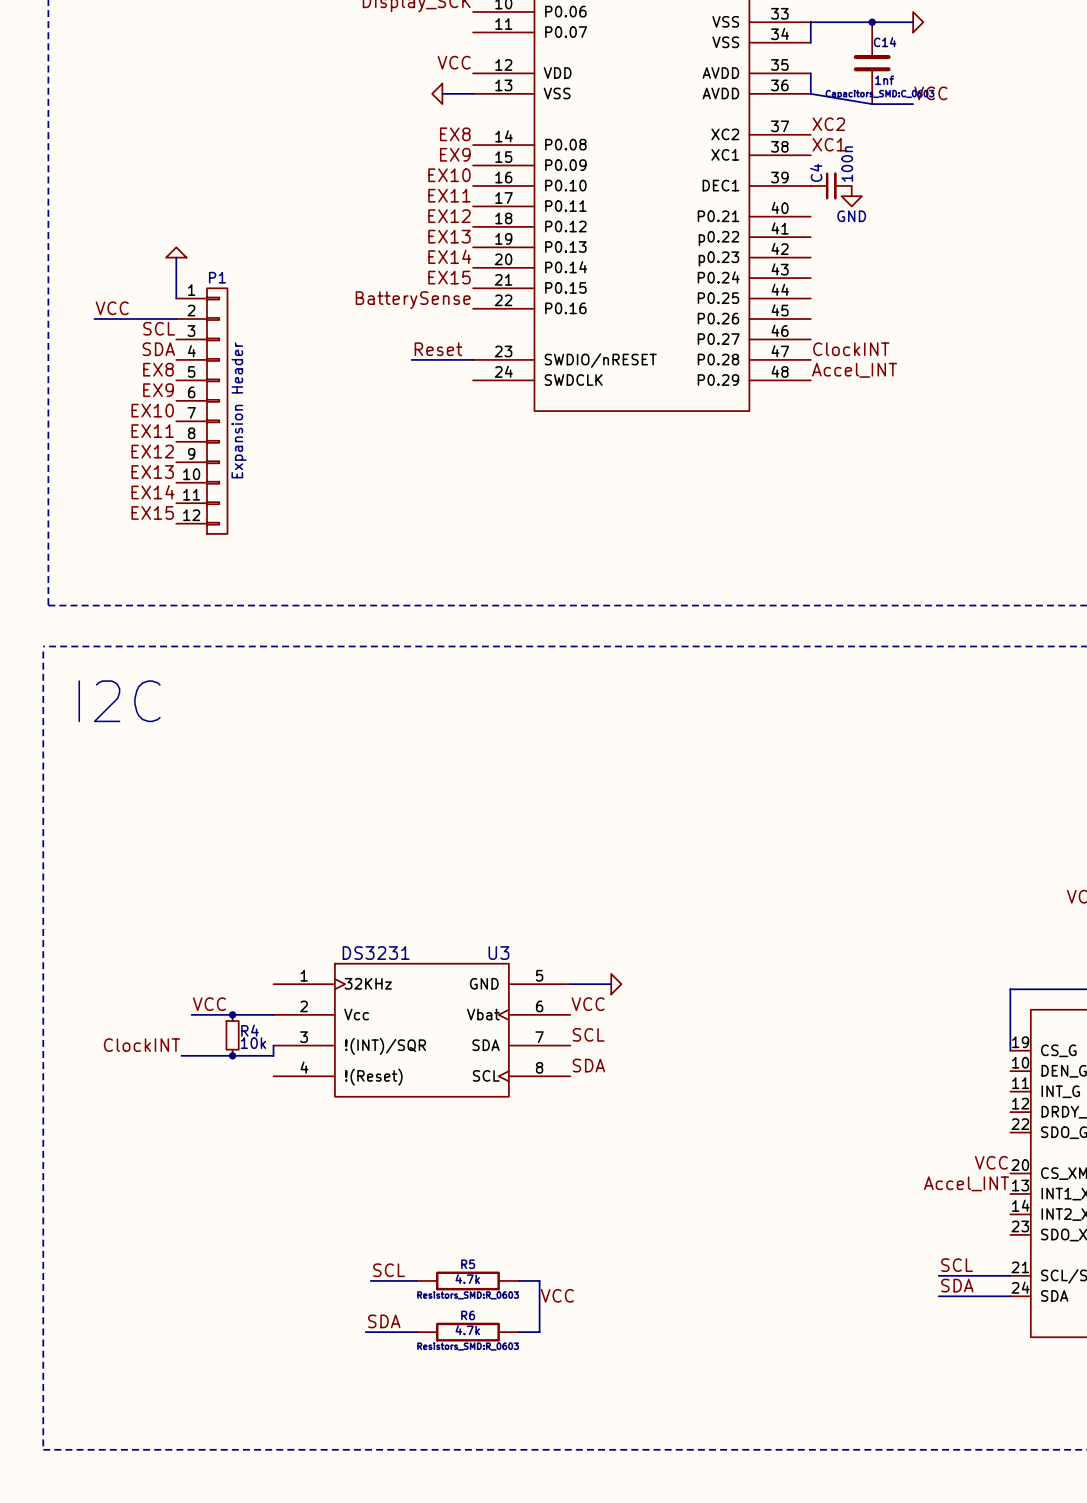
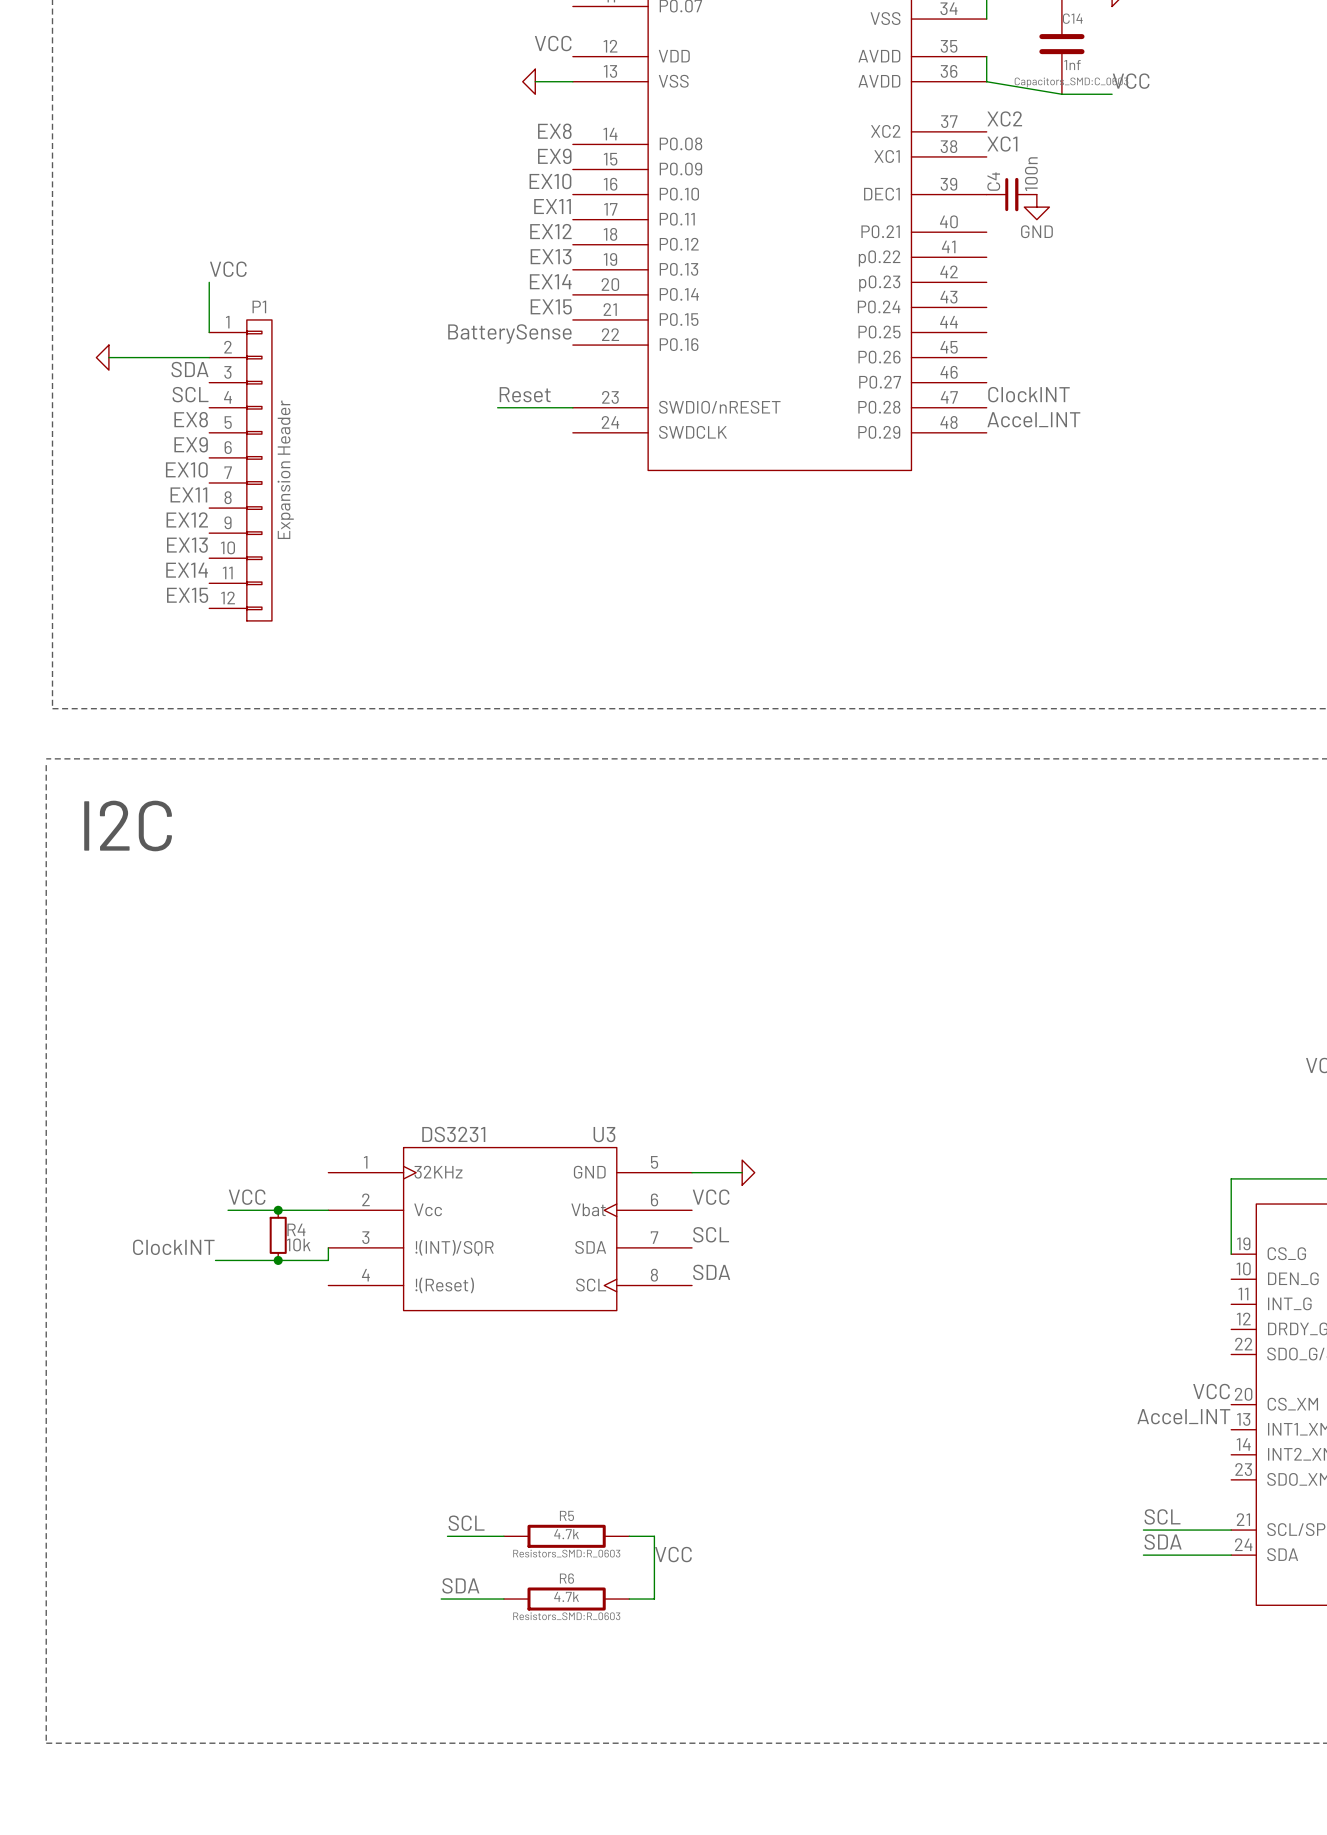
power symbol rotation: 0° (176, 252) -> 90° counterclockwise (102, 357)
power symbol position: (176, 252) -> (102, 357)
label position: VCC (112, 308) -> VCC (228, 269)
label: SCL (159, 328) -> SDA (189, 369)
label: SDA (158, 349) -> SCL (190, 394)

